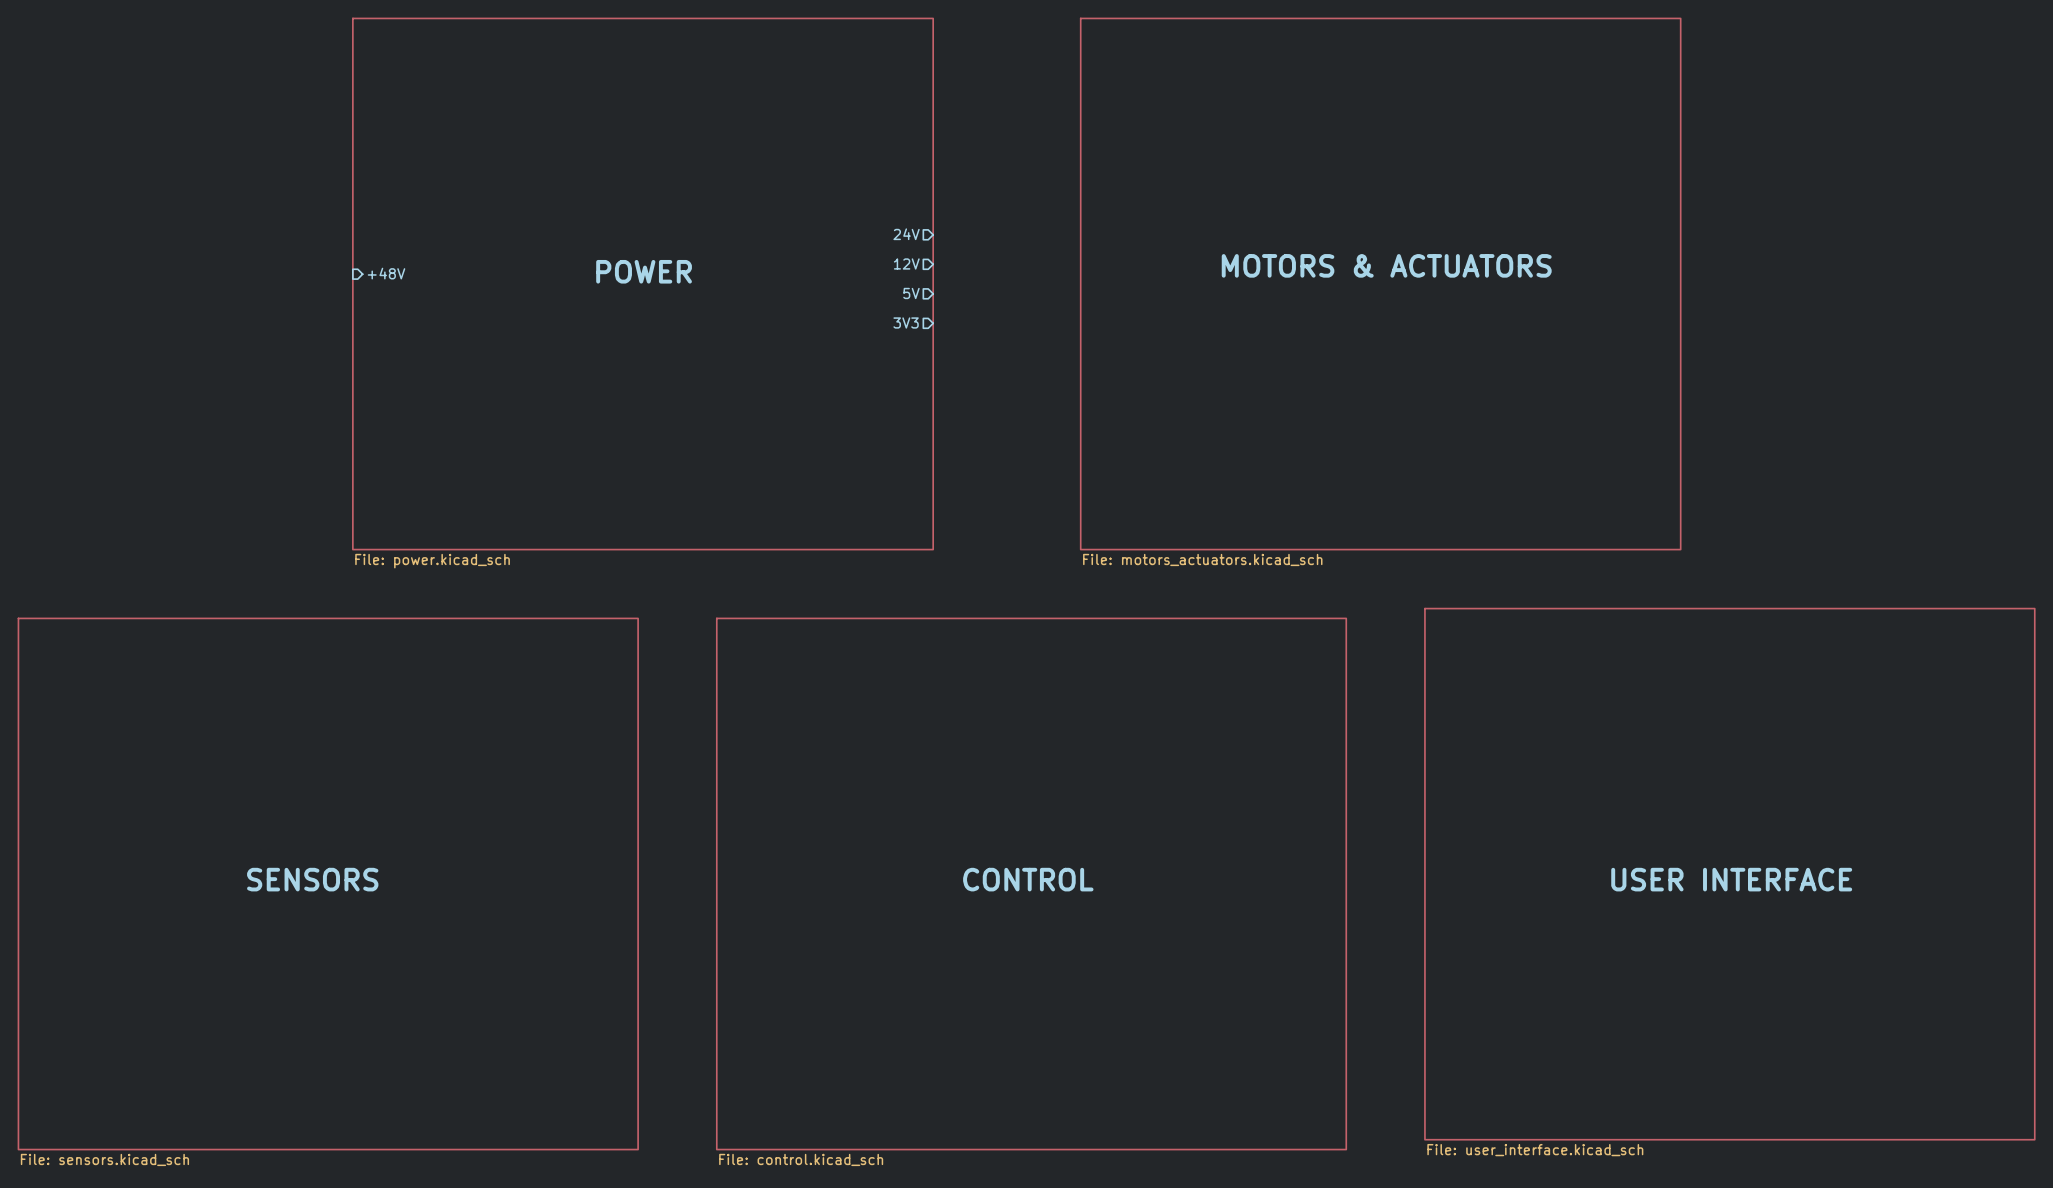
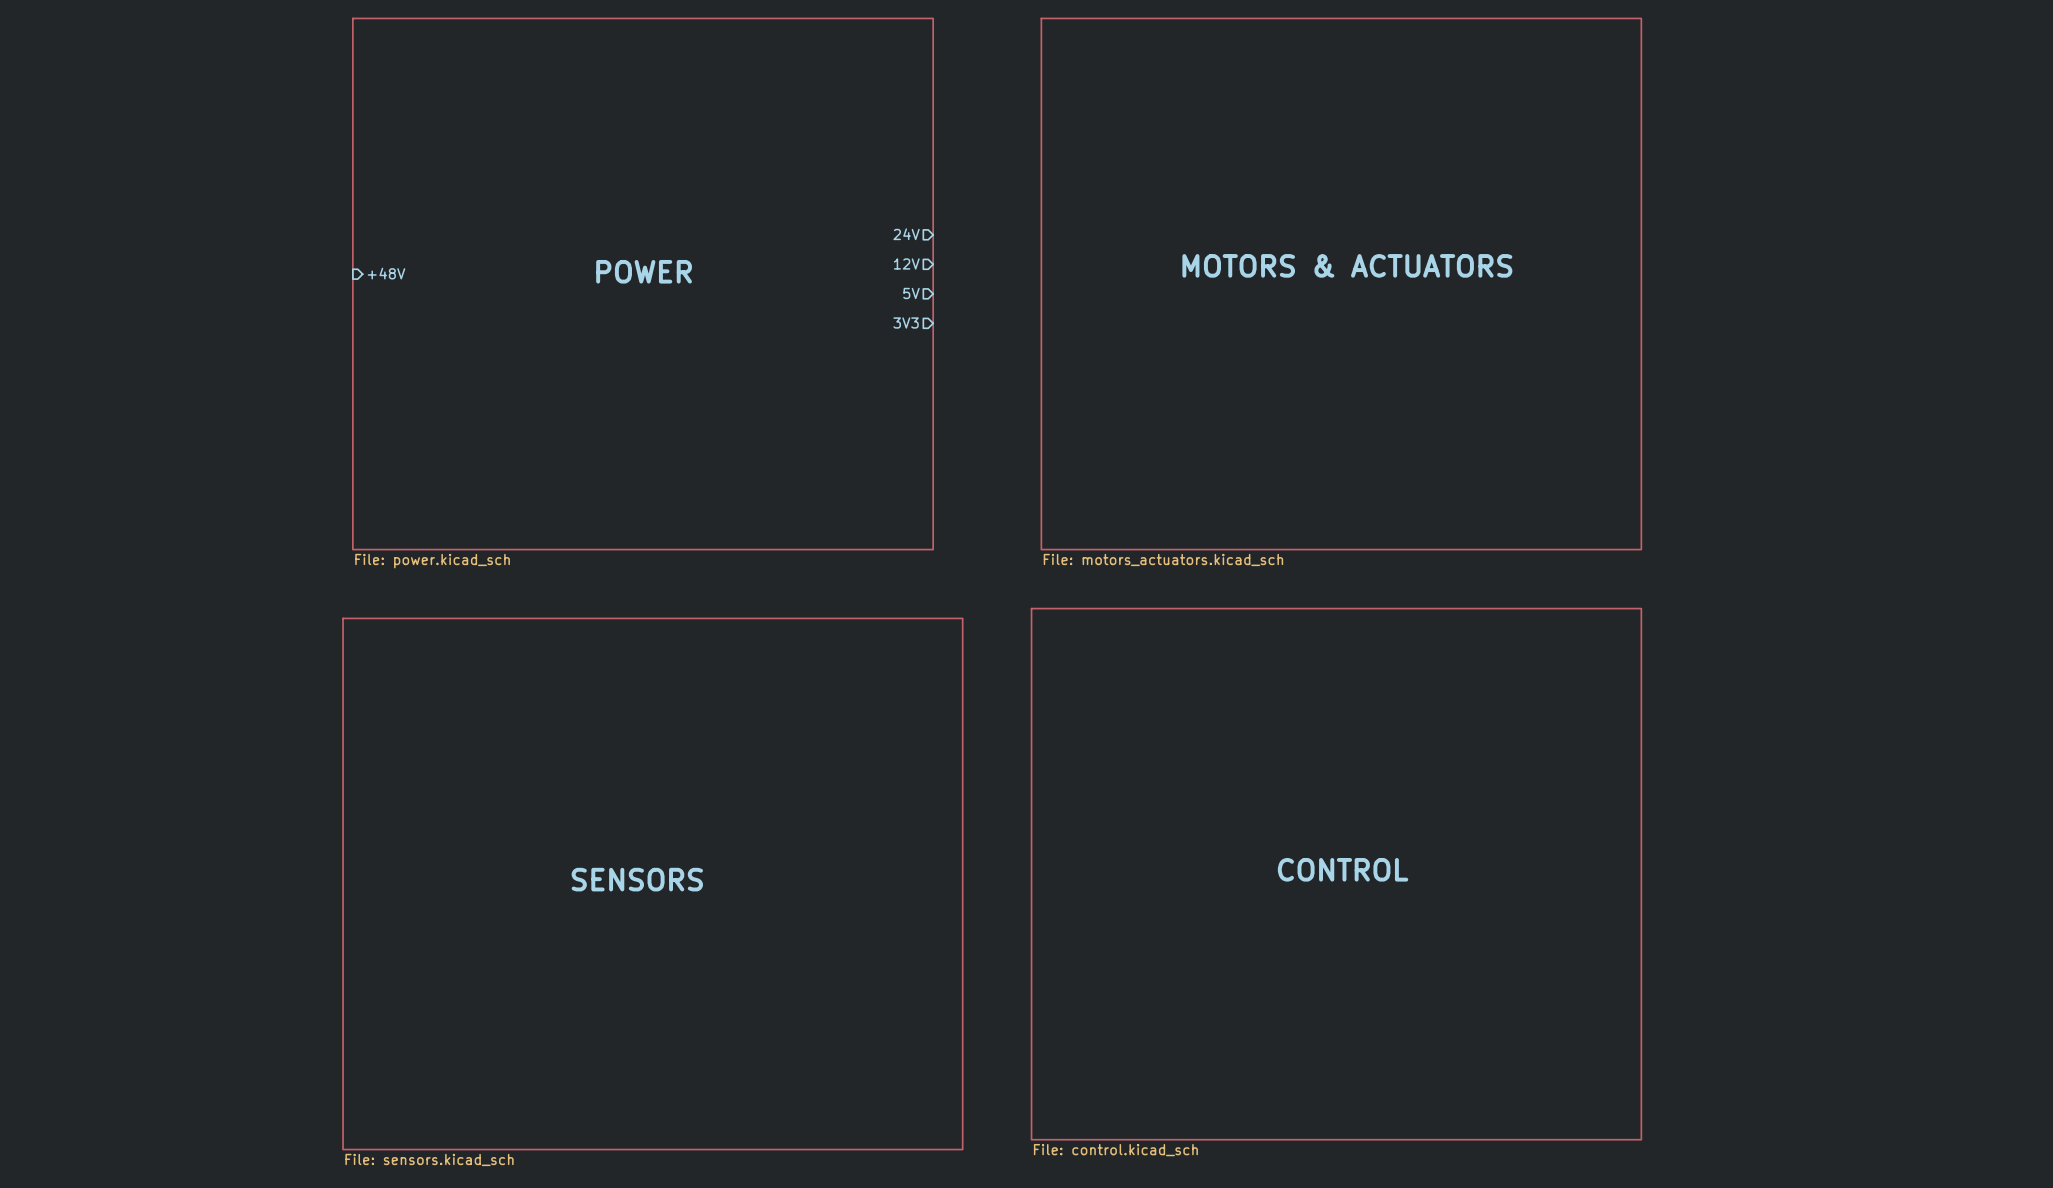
sheet MOTORS & ACTUATORS position: (1380, 284) -> (1341, 284)
sheet CONTROL: none -> File: control.kicad_sch (1336, 874)
sheet USER INTERFACE: File: user_interface.kicad_sch (1729, 874) -> none
sheet SENSORS: File: sensors.kicad_sch (328, 883) -> none
sheet SENSORS: none -> File: sensors.kicad_sch (652, 883)
sheet CONTROL: File: control.kicad_sch (1031, 883) -> none

